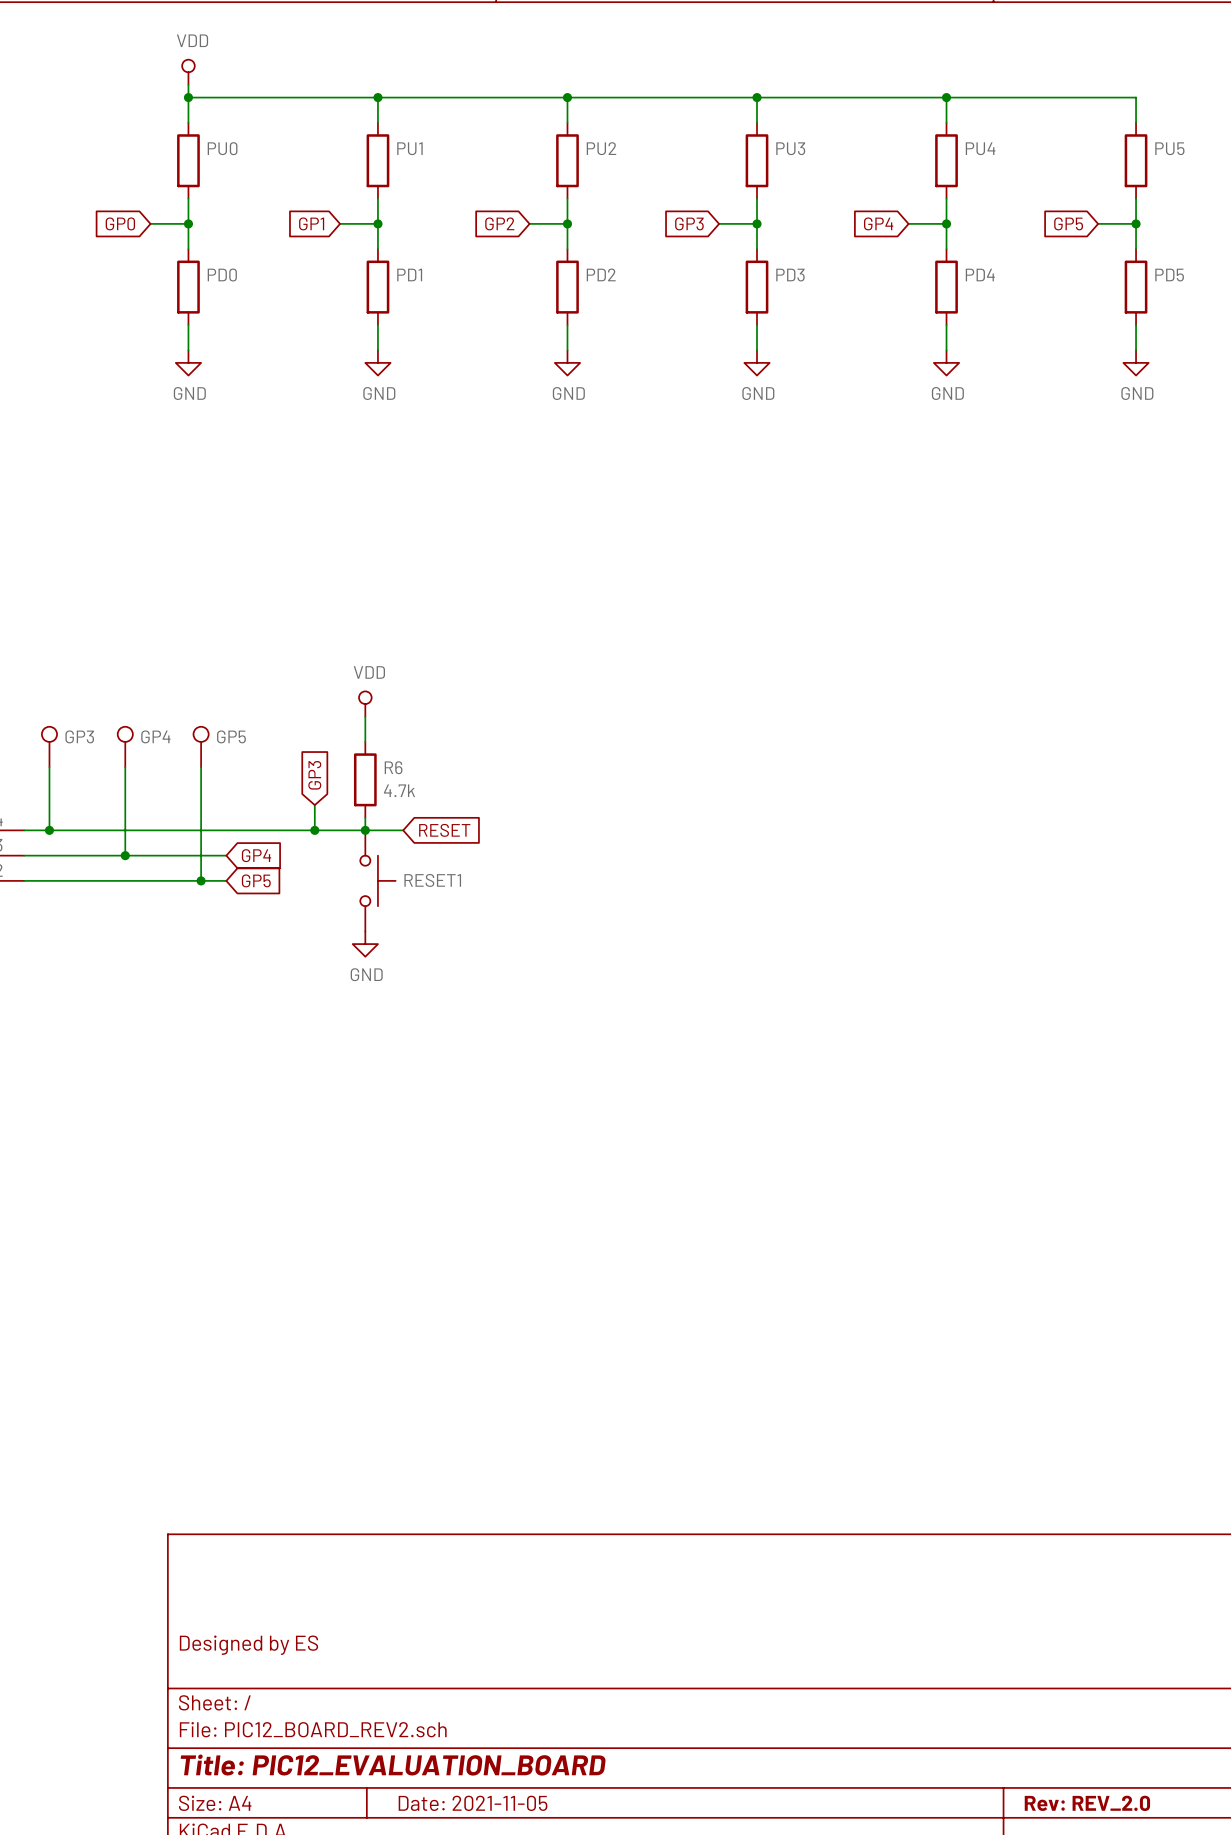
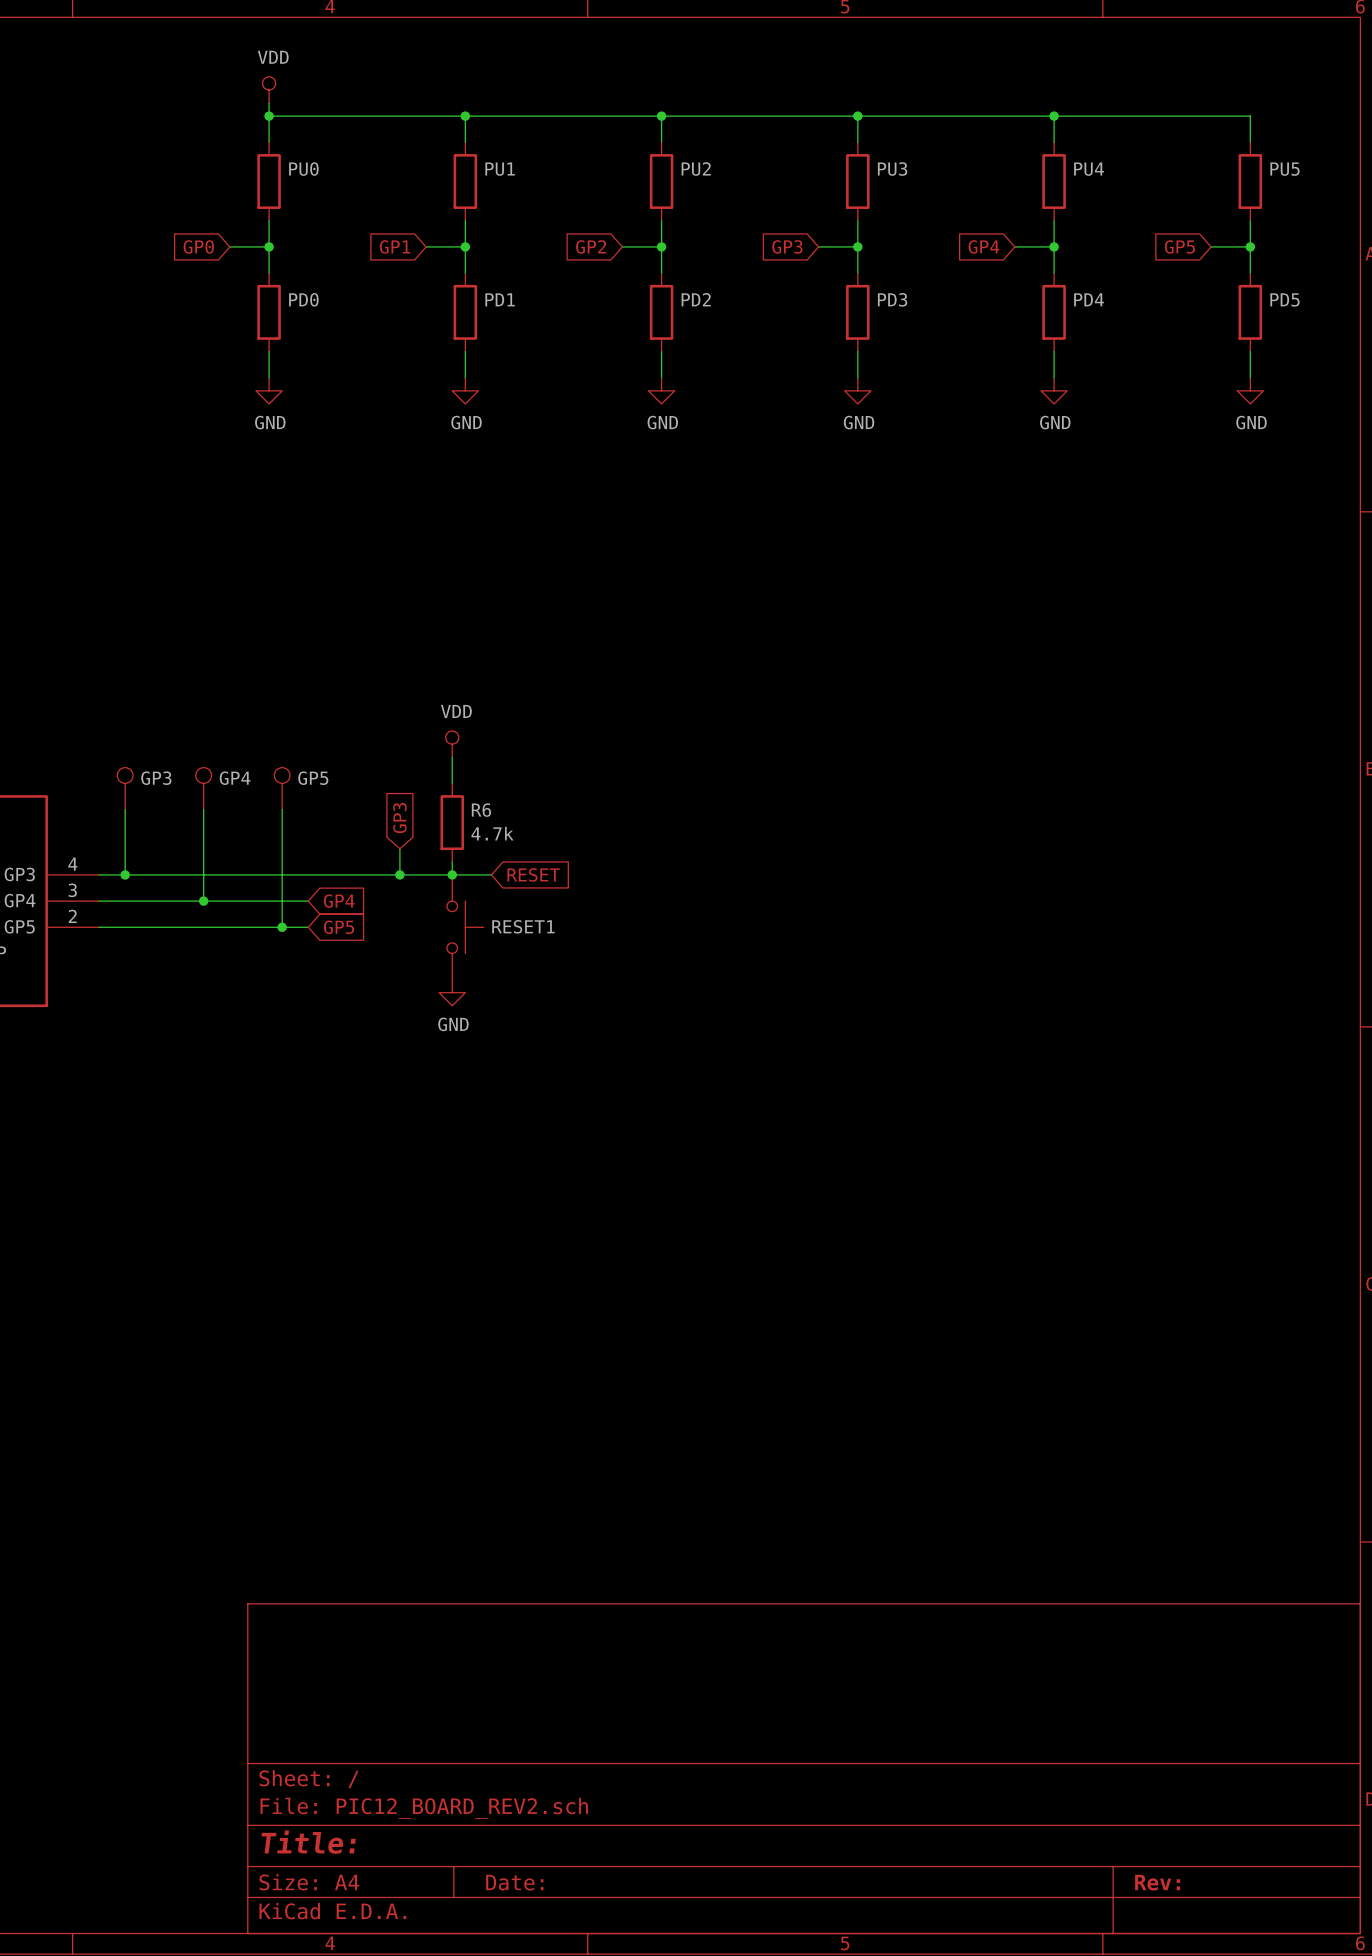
title block: Designed by ES (248, 1645) -> none
title block: Title: PIC12_EVALUATION_BOARD (393, 1765) -> Title: (308, 1842)
title block: Date: 2021-11-05 (473, 1803) -> Date: (514, 1882)
title block: Rev: REV_2.0 (1087, 1803) -> Rev: (1157, 1882)

